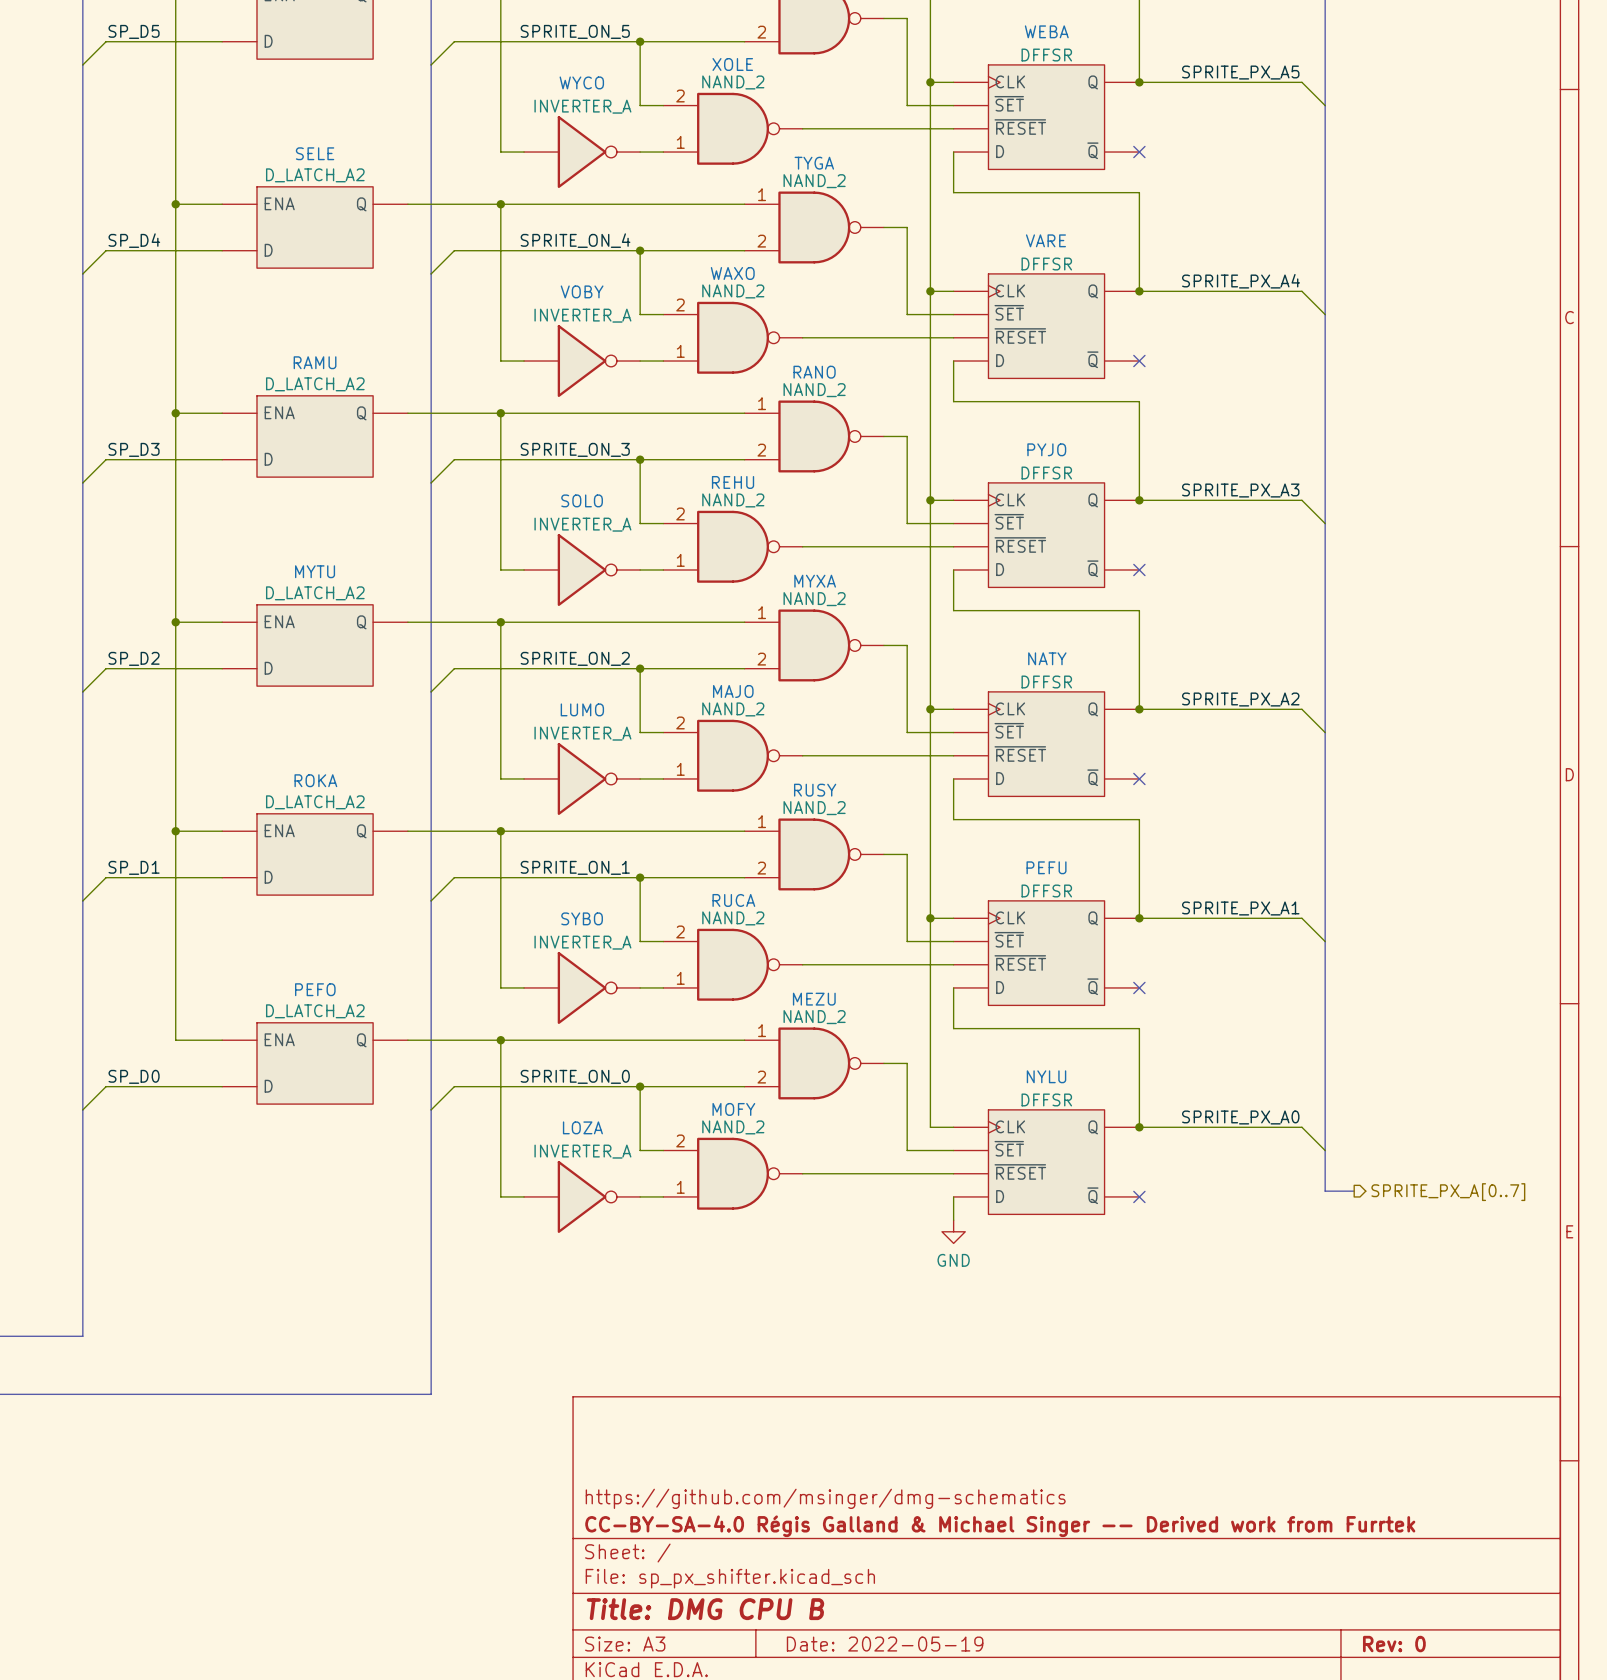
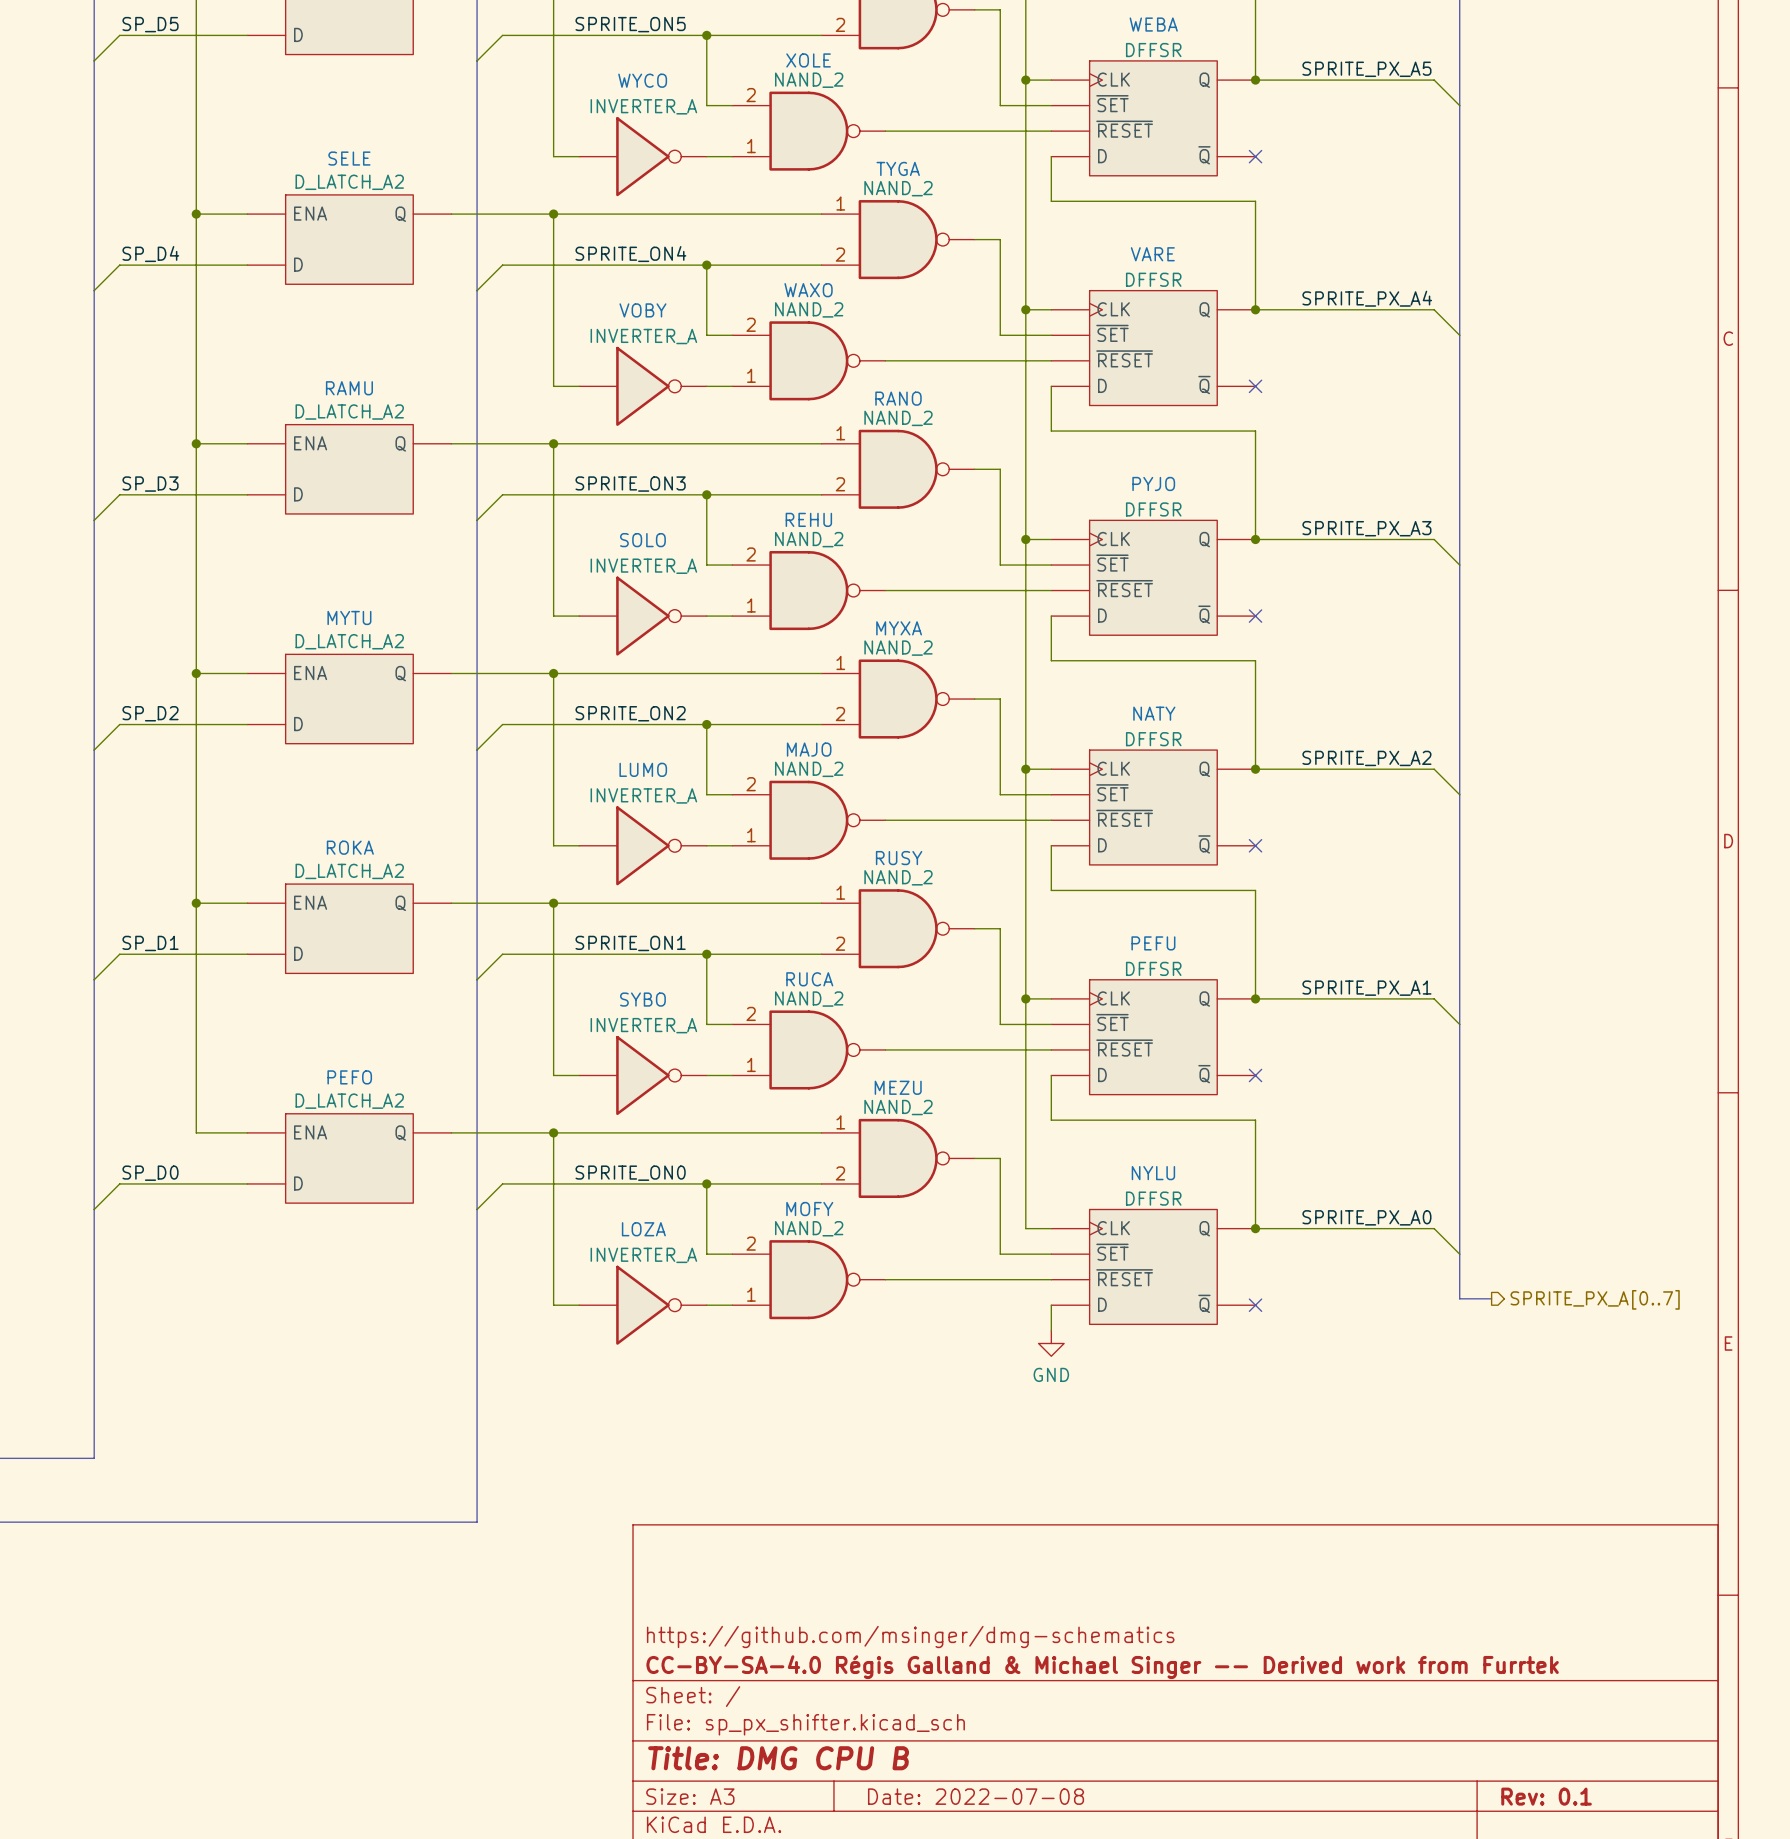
label: SPRITE_ON_5 (575, 31) -> SPRITE_ON5 (630, 24)
label: SPRITE_ON_4 (575, 240) -> SPRITE_ON4 (630, 254)
label: SPRITE_ON_3 (575, 449) -> SPRITE_ON3 (630, 484)
label: SPRITE_ON_2 (575, 658) -> SPRITE_ON2 (630, 713)
label: SPRITE_ON_1 (575, 867) -> SPRITE_ON1 (630, 943)
label: SPRITE_ON_0 (575, 1076) -> SPRITE_ON0 (630, 1173)
title block: Date: 2022-05-19 (885, 1644) -> Date: 2022-07-08 (976, 1796)
title block: Rev: 0 (1394, 1644) -> Rev: 0.1 (1546, 1796)

